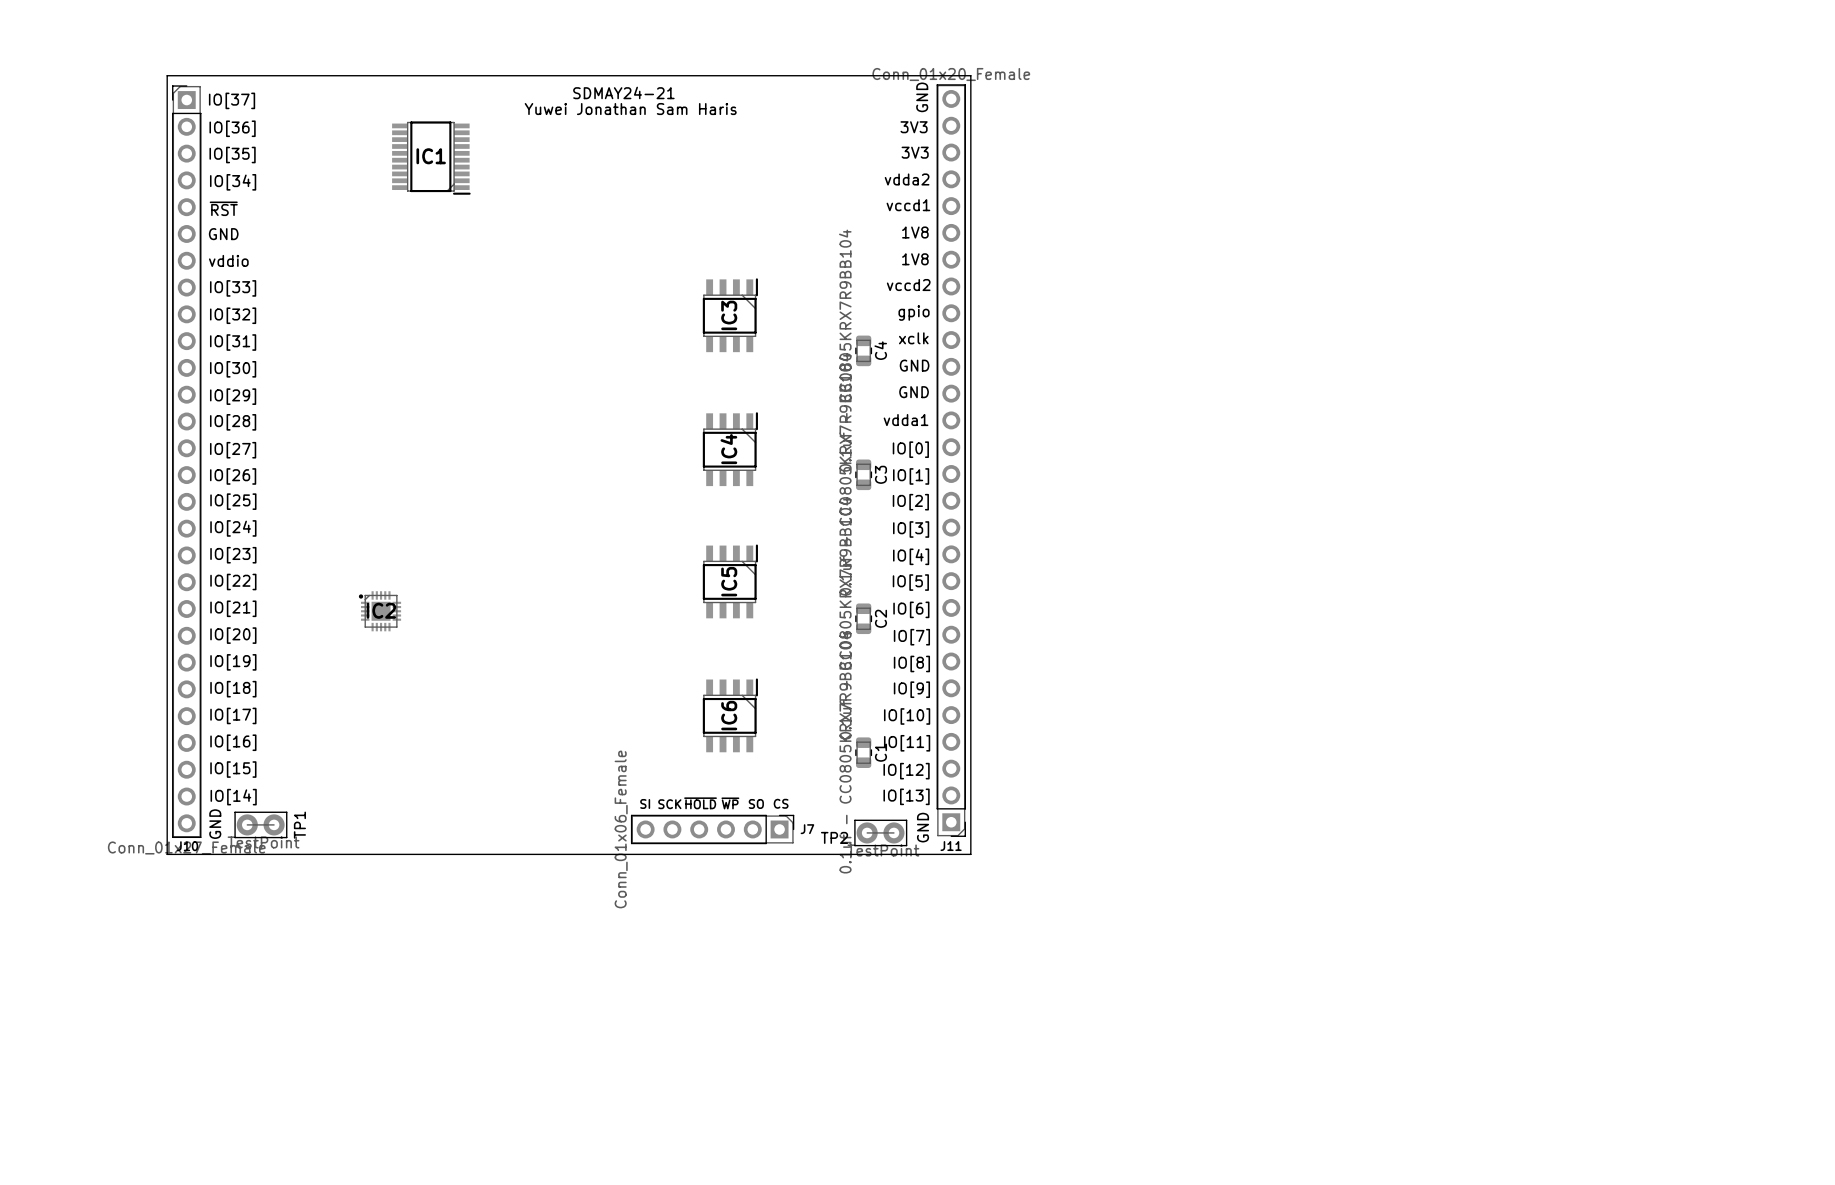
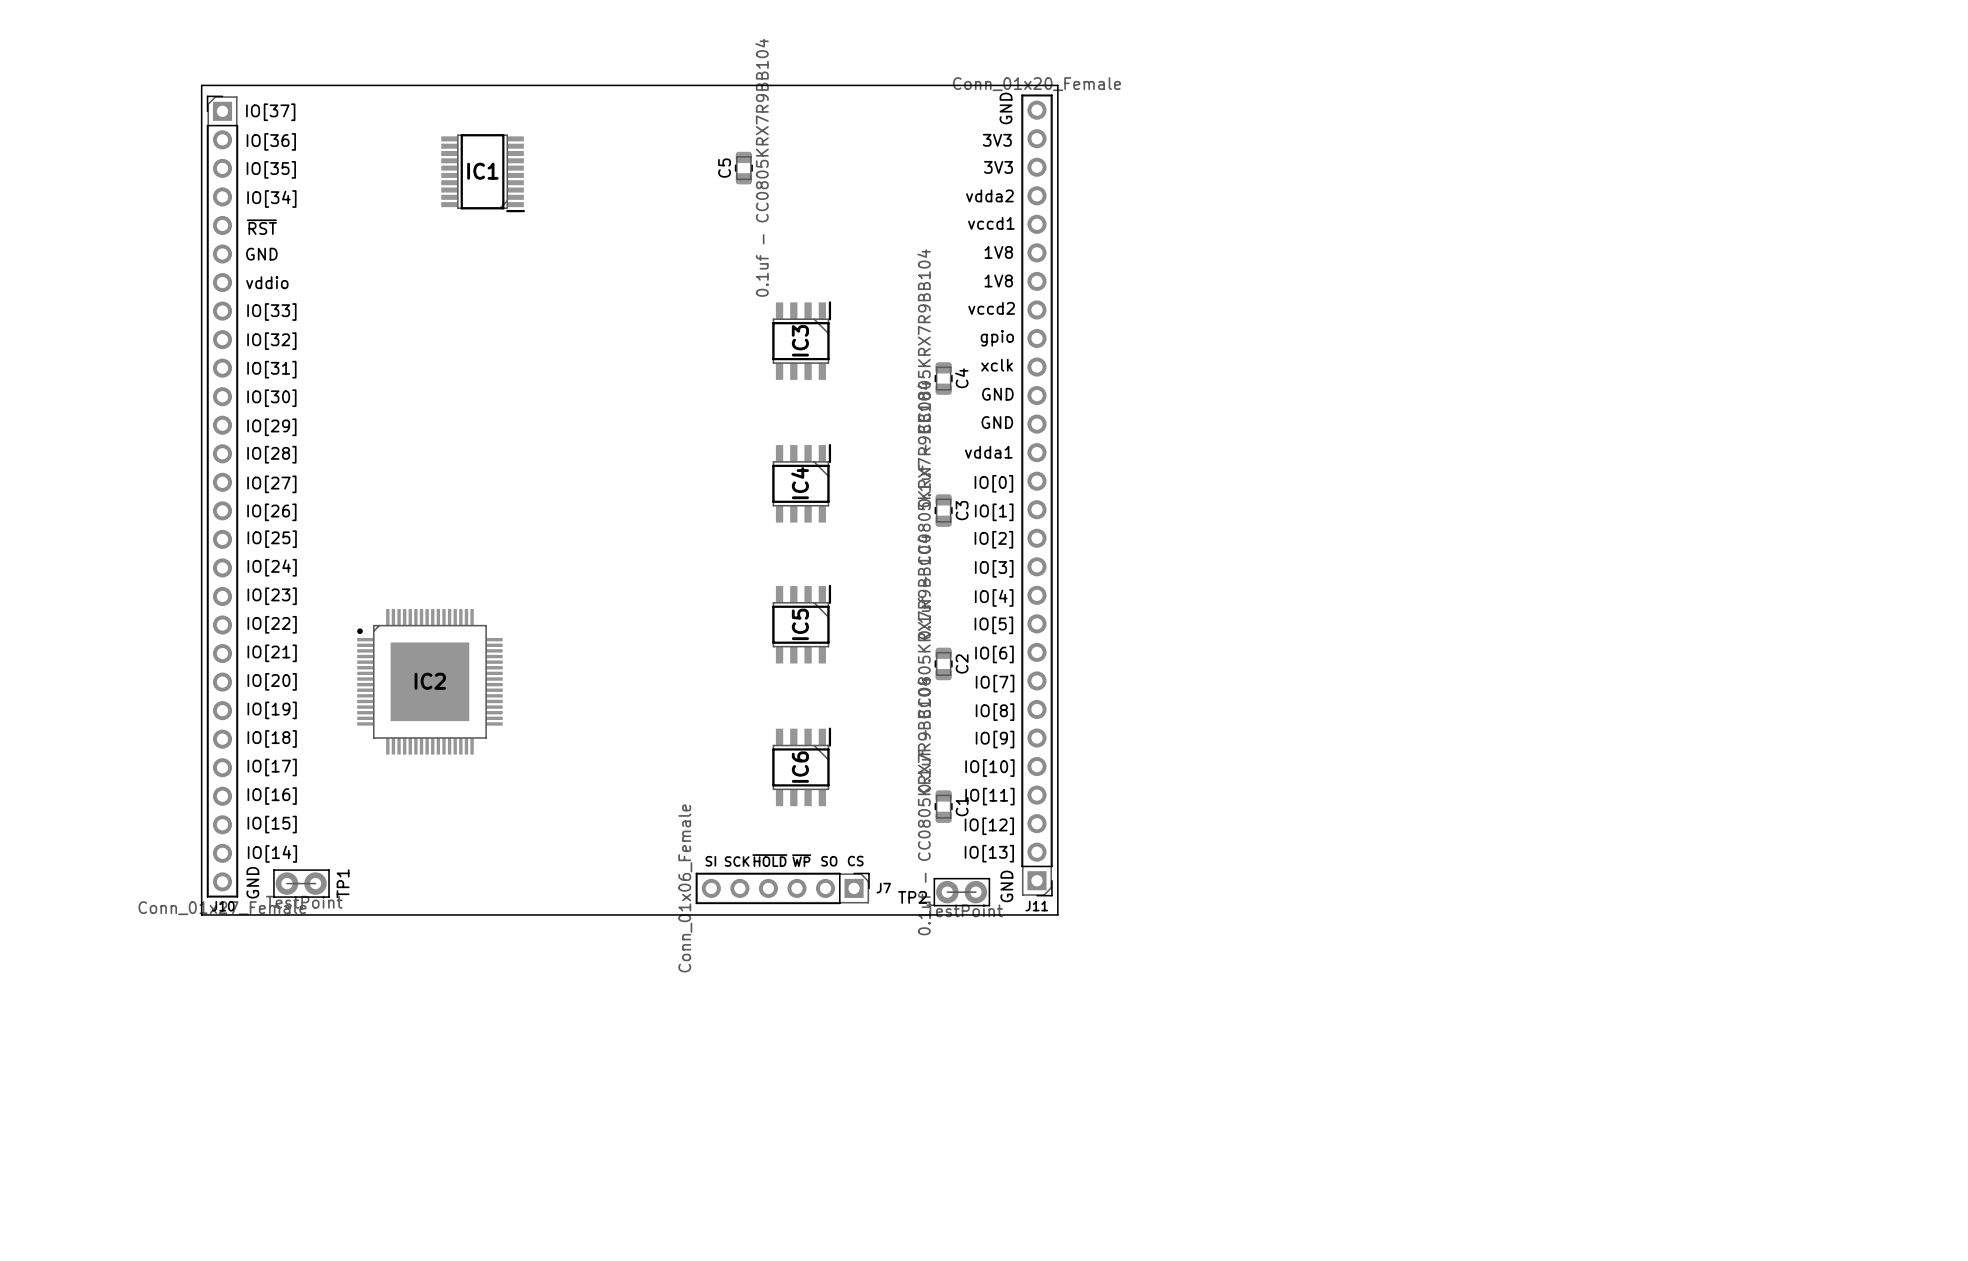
text: SDMAY24-21 (623, 92) -> none
text: Yuwei Jonathan Sam Haris (630, 109) -> none
C5: none -> 0.1uf - CC0805KRX7R9BB104 (743, 168)
IC2 footprint: [358, 591, 402, 632] -> [357, 609, 503, 755]

